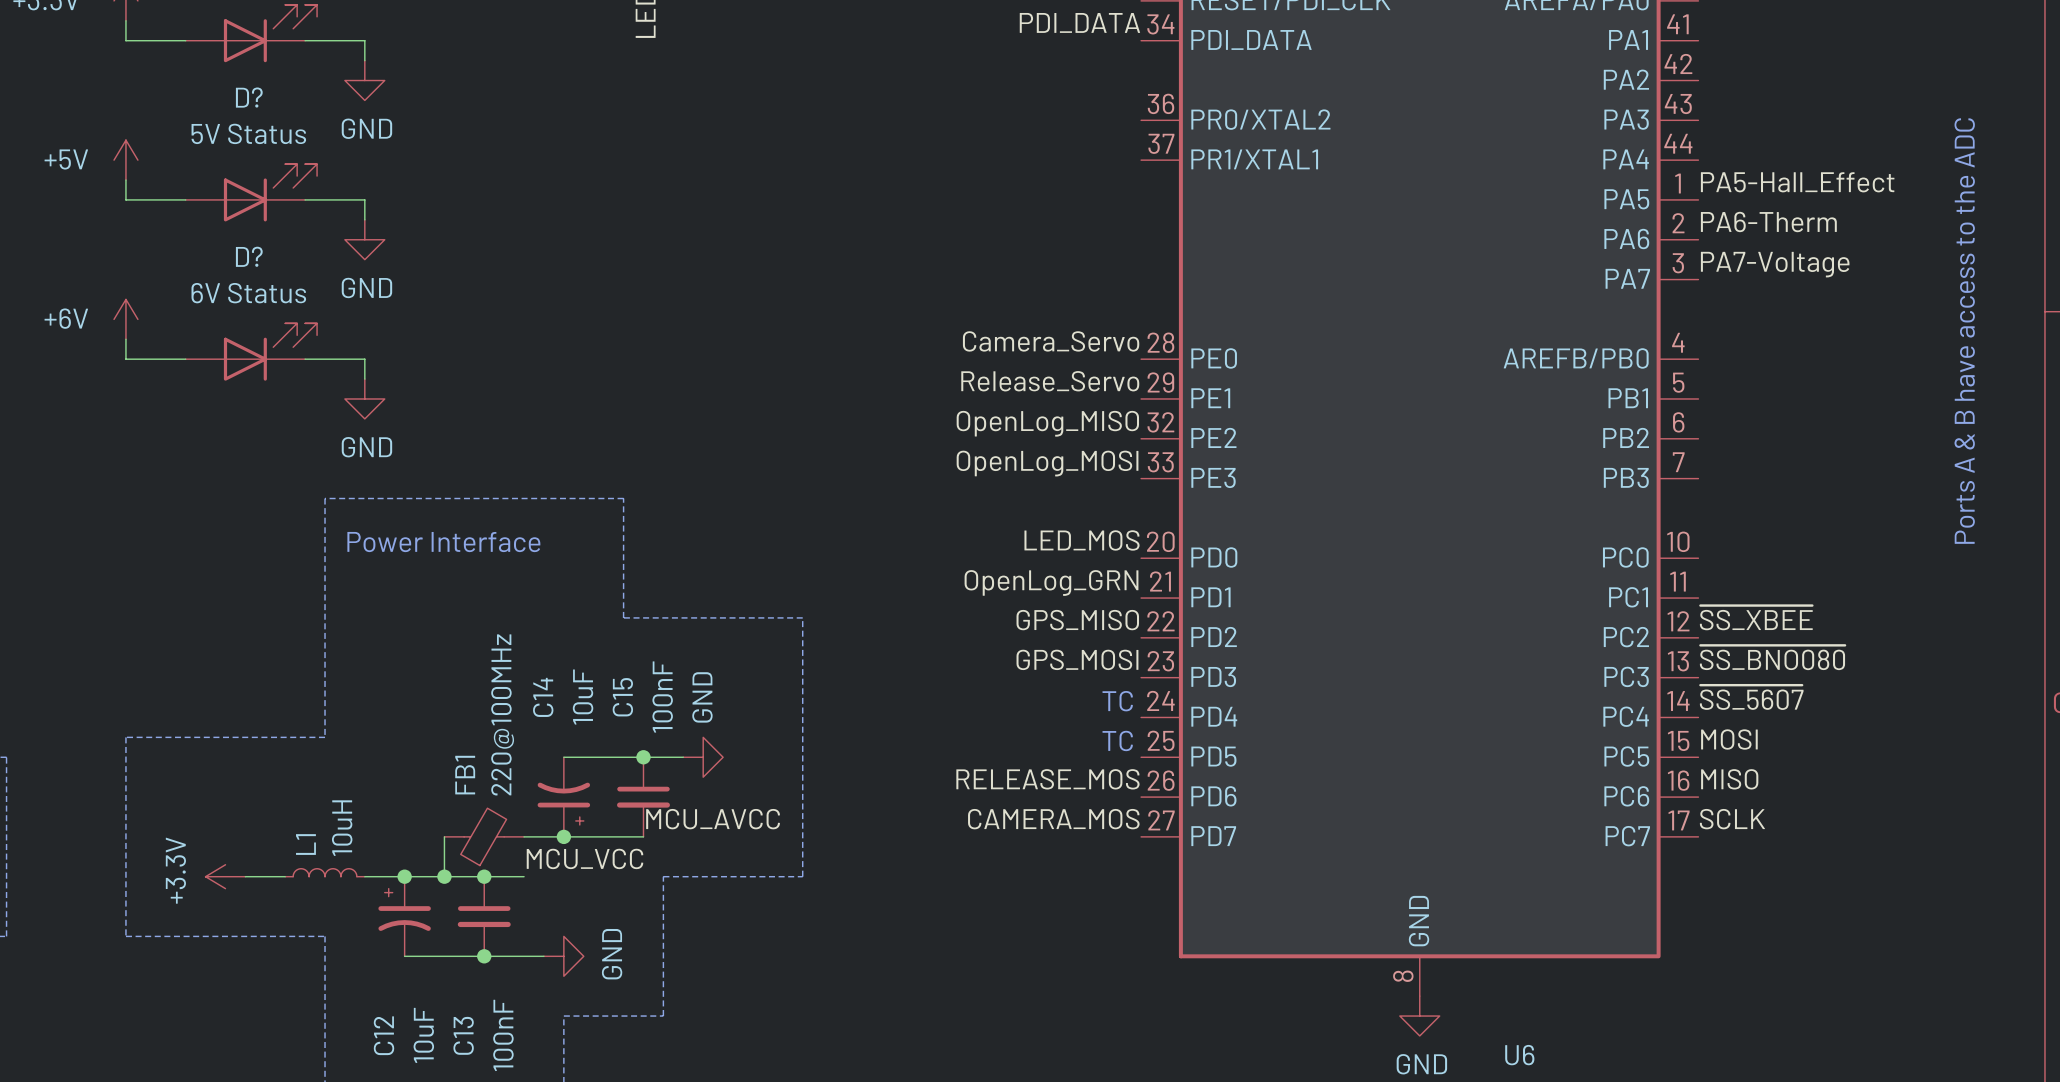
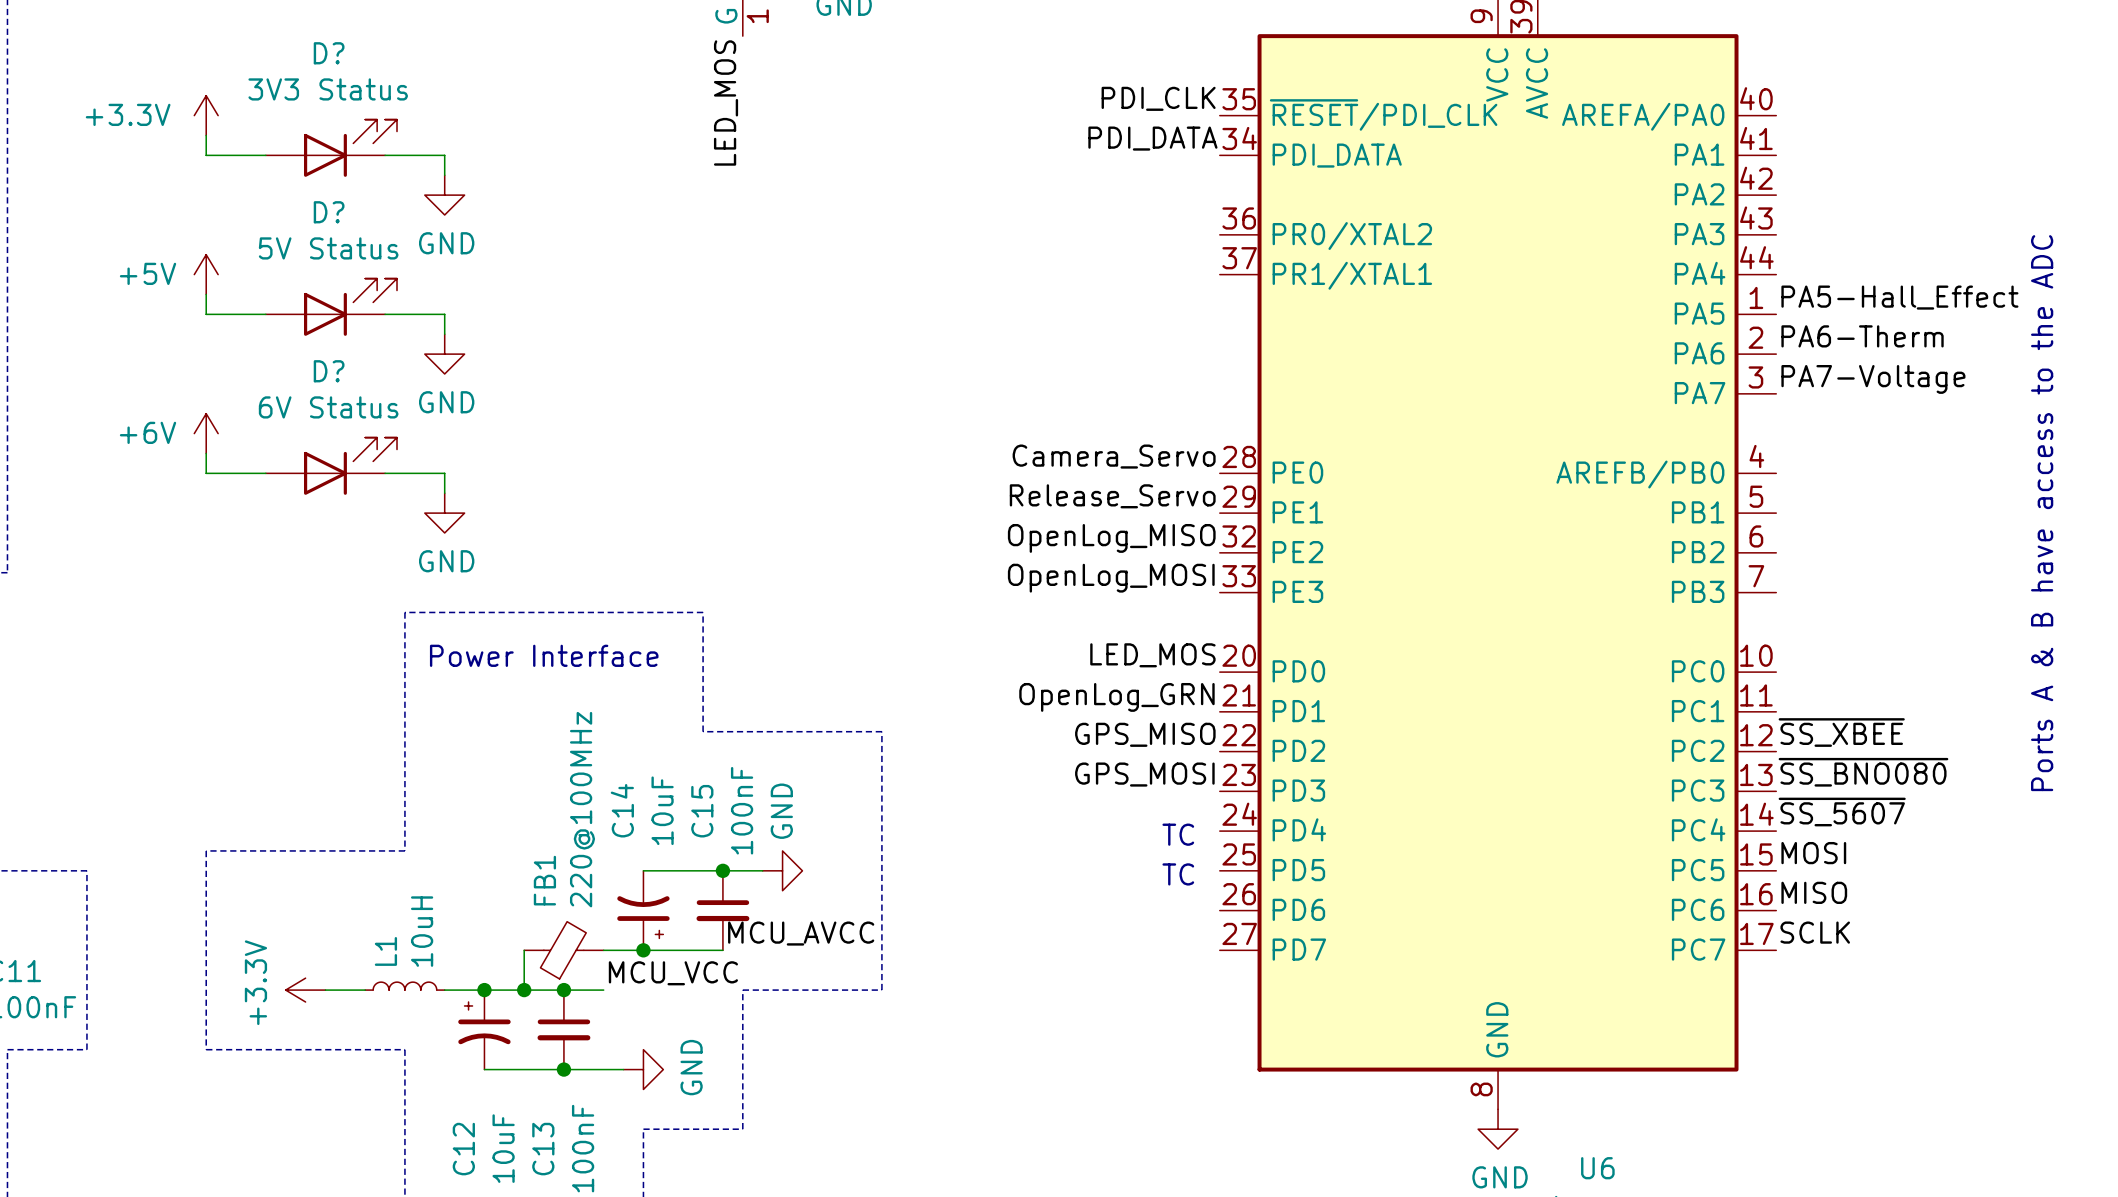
text: TC (1117, 701) -> none
text: none -> TC (1178, 834)
text: TC (1117, 740) -> none
text: none -> TC (1178, 874)
label: RELEASE_MOS (1047, 779) -> none
label: CAMERA_MOS (1053, 819) -> none

